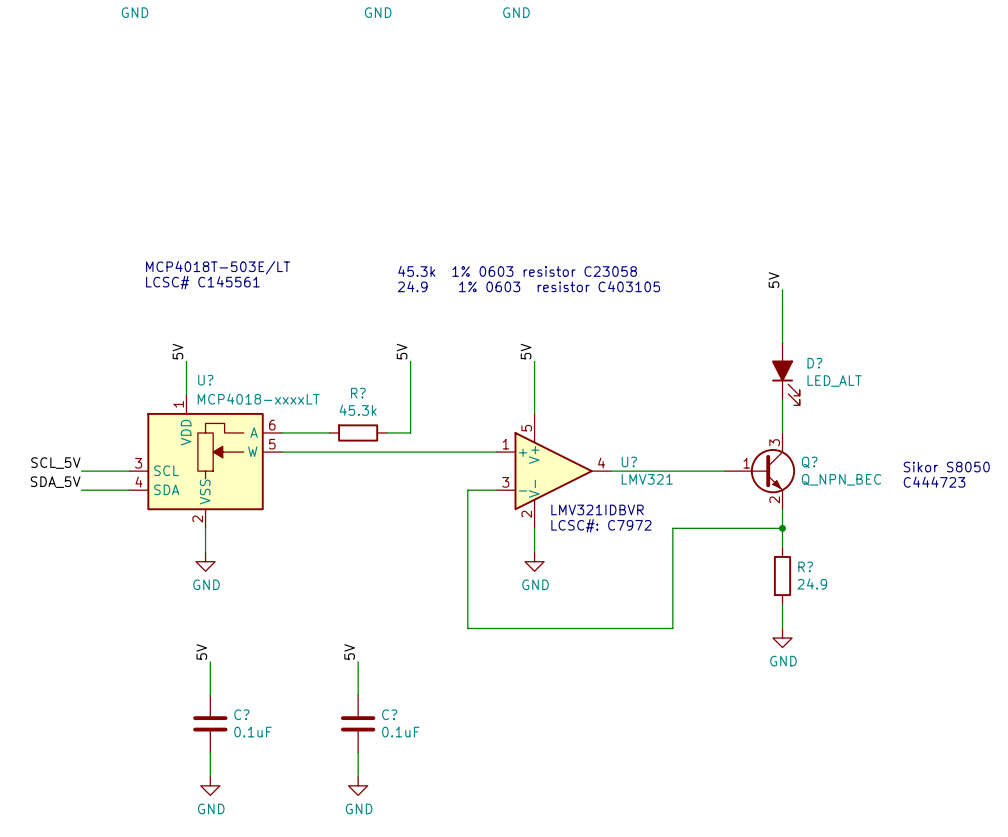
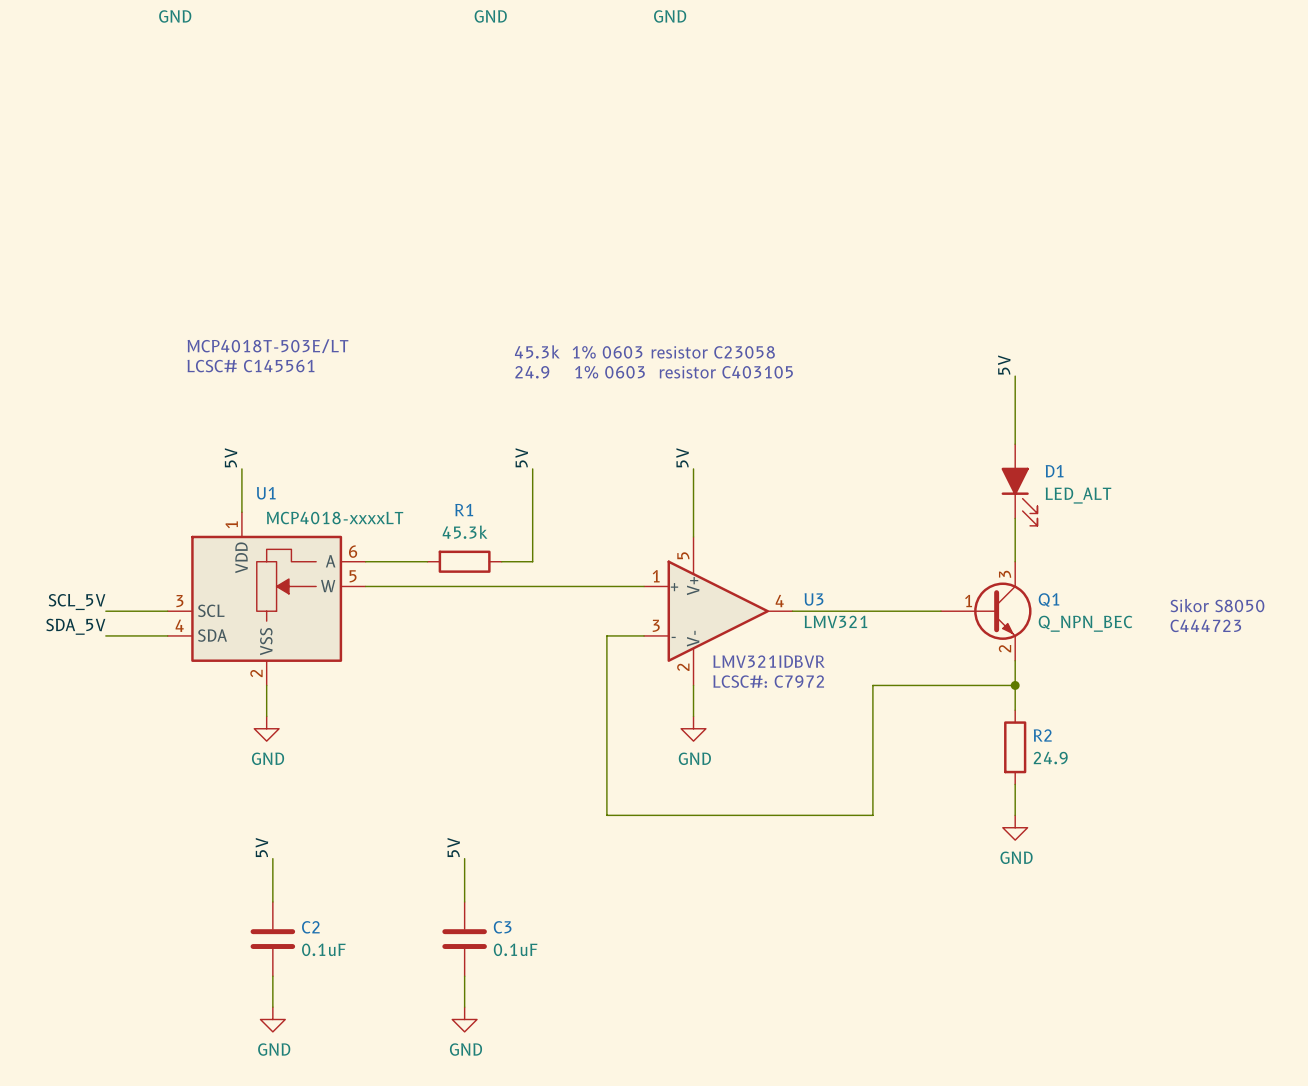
D? name: D? (814, 363) -> D1 (1054, 471)
U? name: U? (205, 380) -> U1 (266, 493)
R? name: R? (358, 393) -> R1 (464, 510)
U? name: U? (629, 461) -> U3 (813, 599)
Q? name: Q? (809, 462) -> Q1 (1049, 599)
R? name: R? (805, 566) -> R2 (1042, 735)
C? name: C? (241, 714) -> C2 (310, 927)
C? name: C? (389, 714) -> C3 (502, 927)

